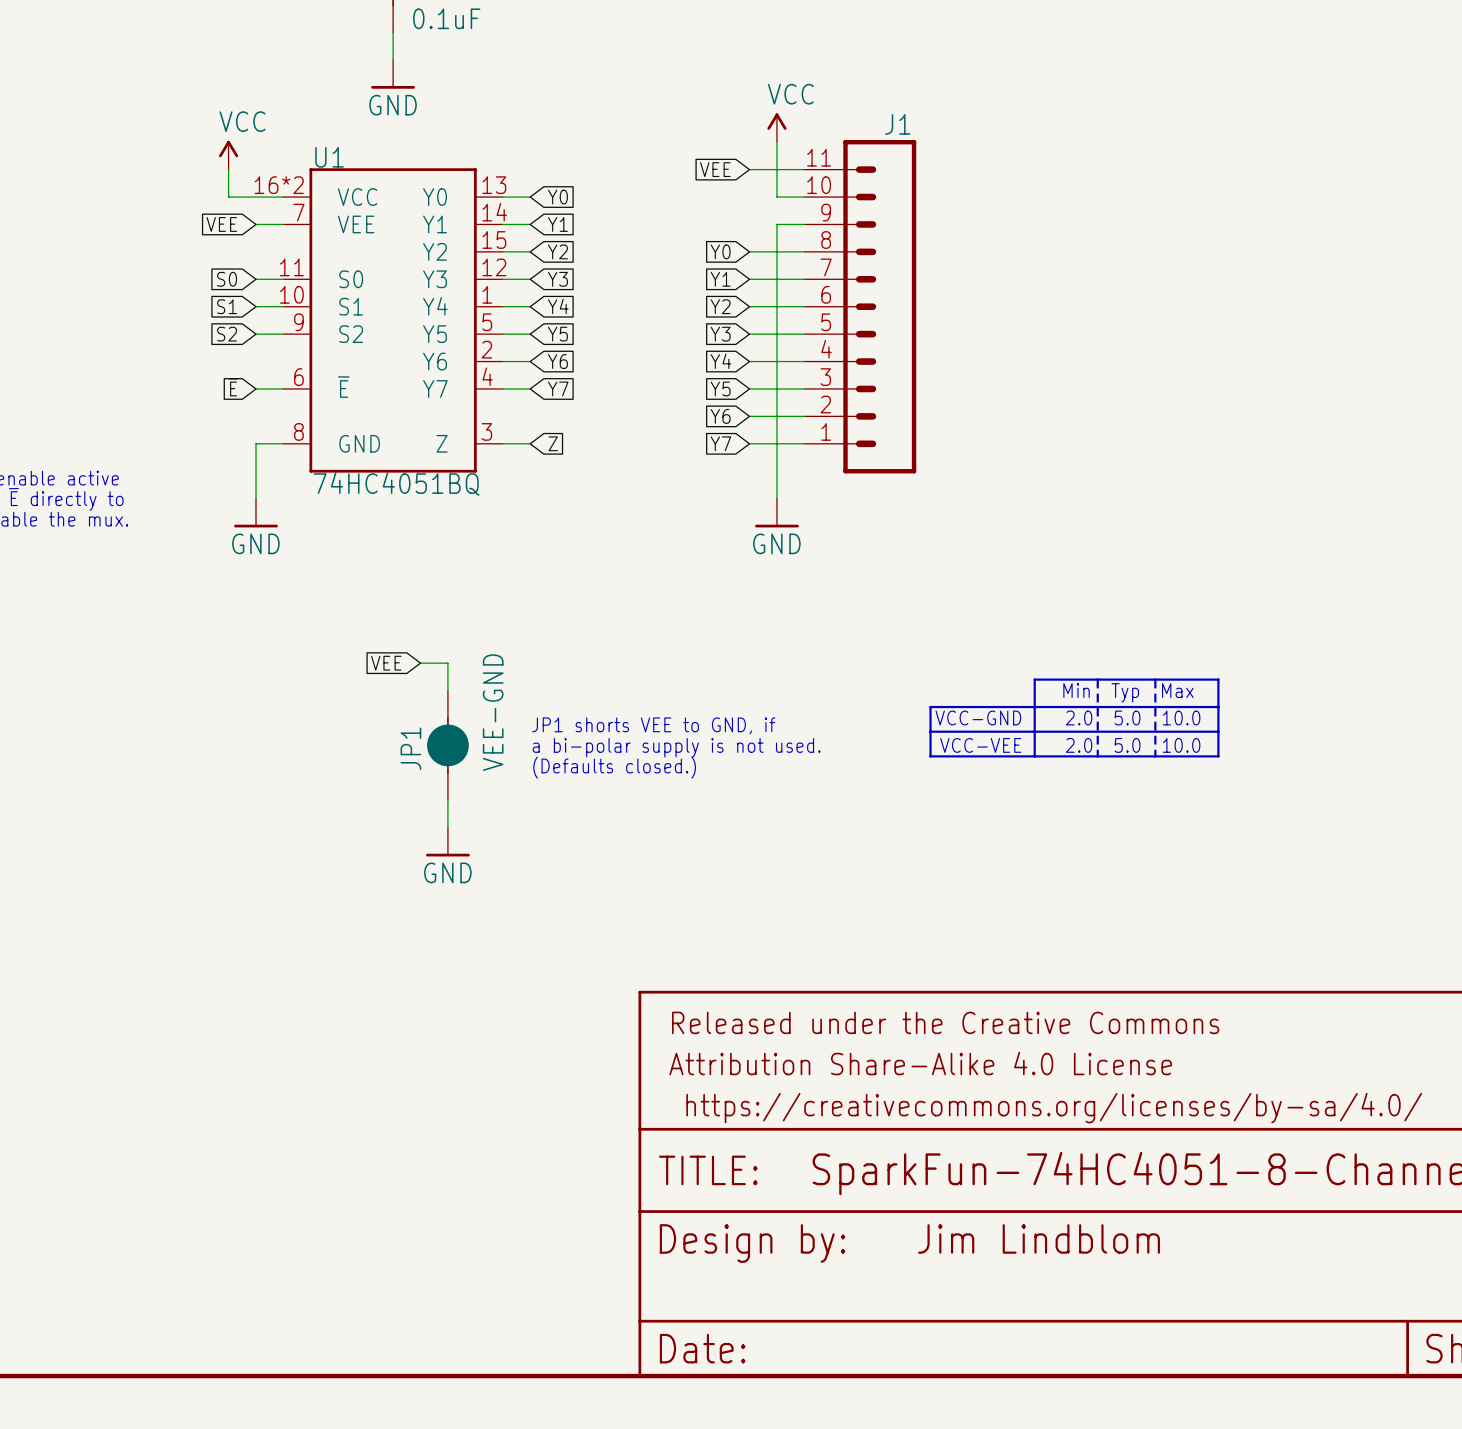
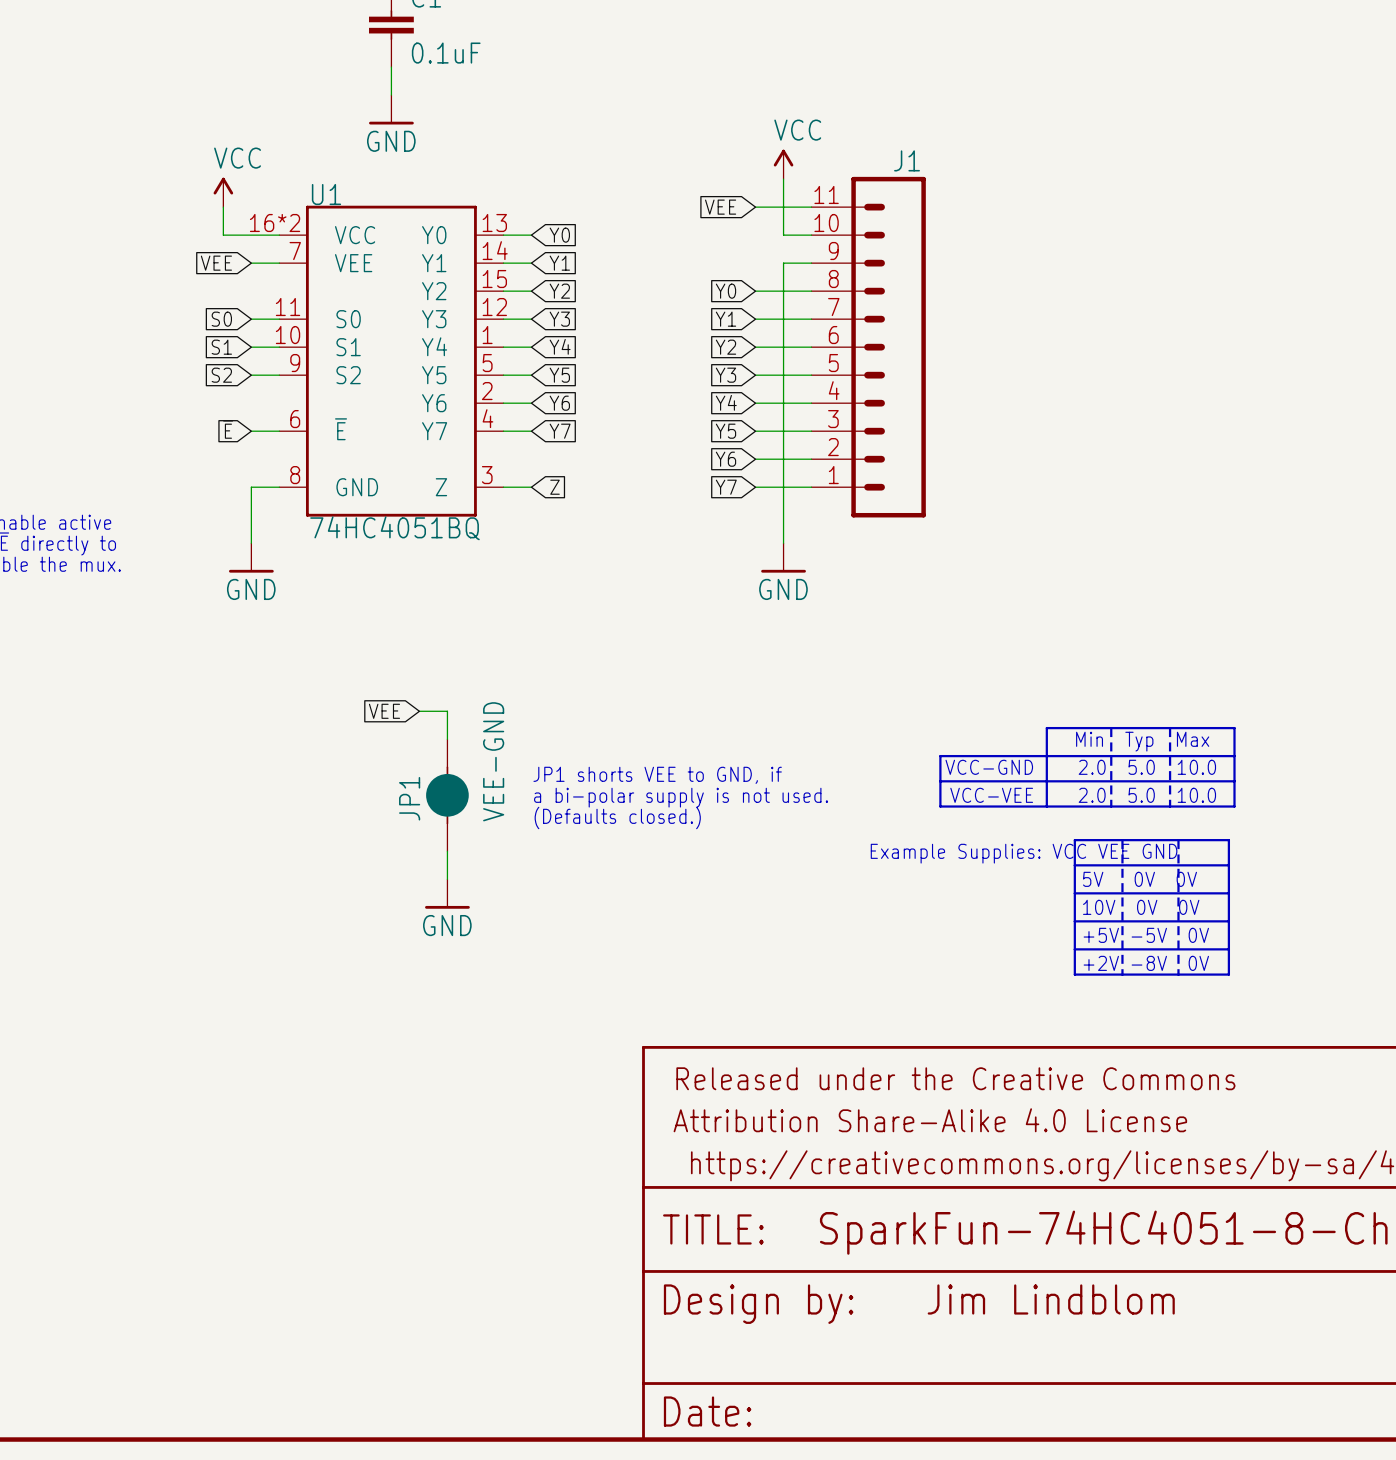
line: none -> (1074, 840) (1074, 974) (1228, 974) (1228, 840) (1074, 840)
line: none -> (1122, 840) (1122, 974)
line: none -> (1178, 840) (1178, 974)
text: none -> Example Supplies: VCC VEE GND (1024, 853)
line: none -> (1074, 865) (1228, 865)
text: none -> 5V 0V 0V (1140, 879)
line: none -> (1074, 893) (1228, 893)
text: none -> 10V 0V 0V (1141, 907)
line: none -> (1074, 921) (1228, 921)
text: none -> +5V -5V 0V (1146, 935)
line: none -> (1074, 949) (1228, 949)
text: none -> +2V -8V 0V (1146, 963)

